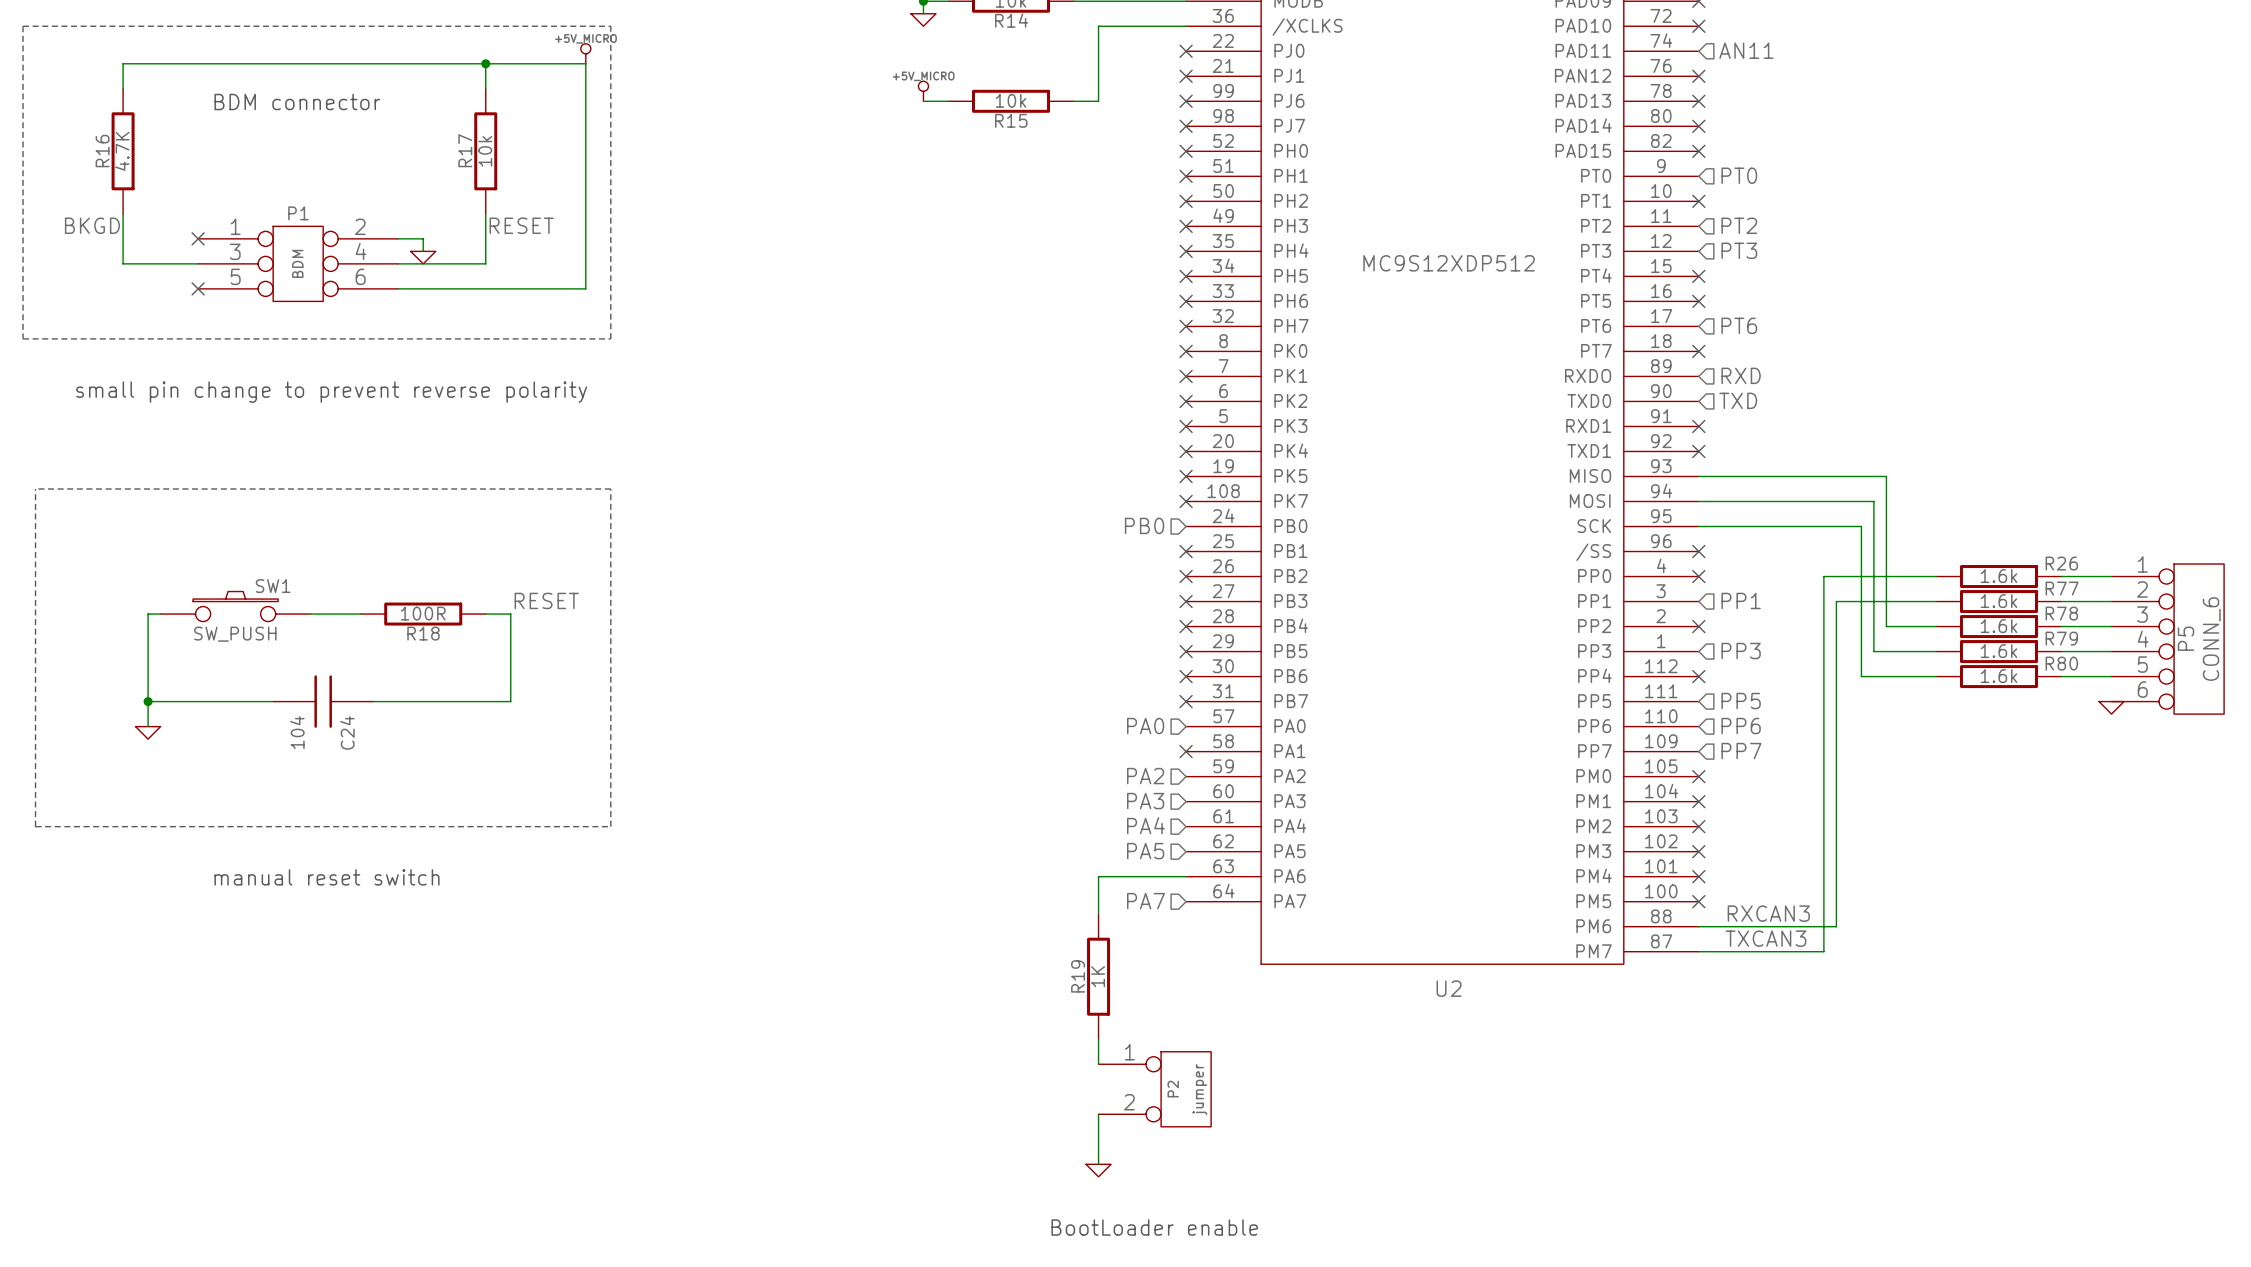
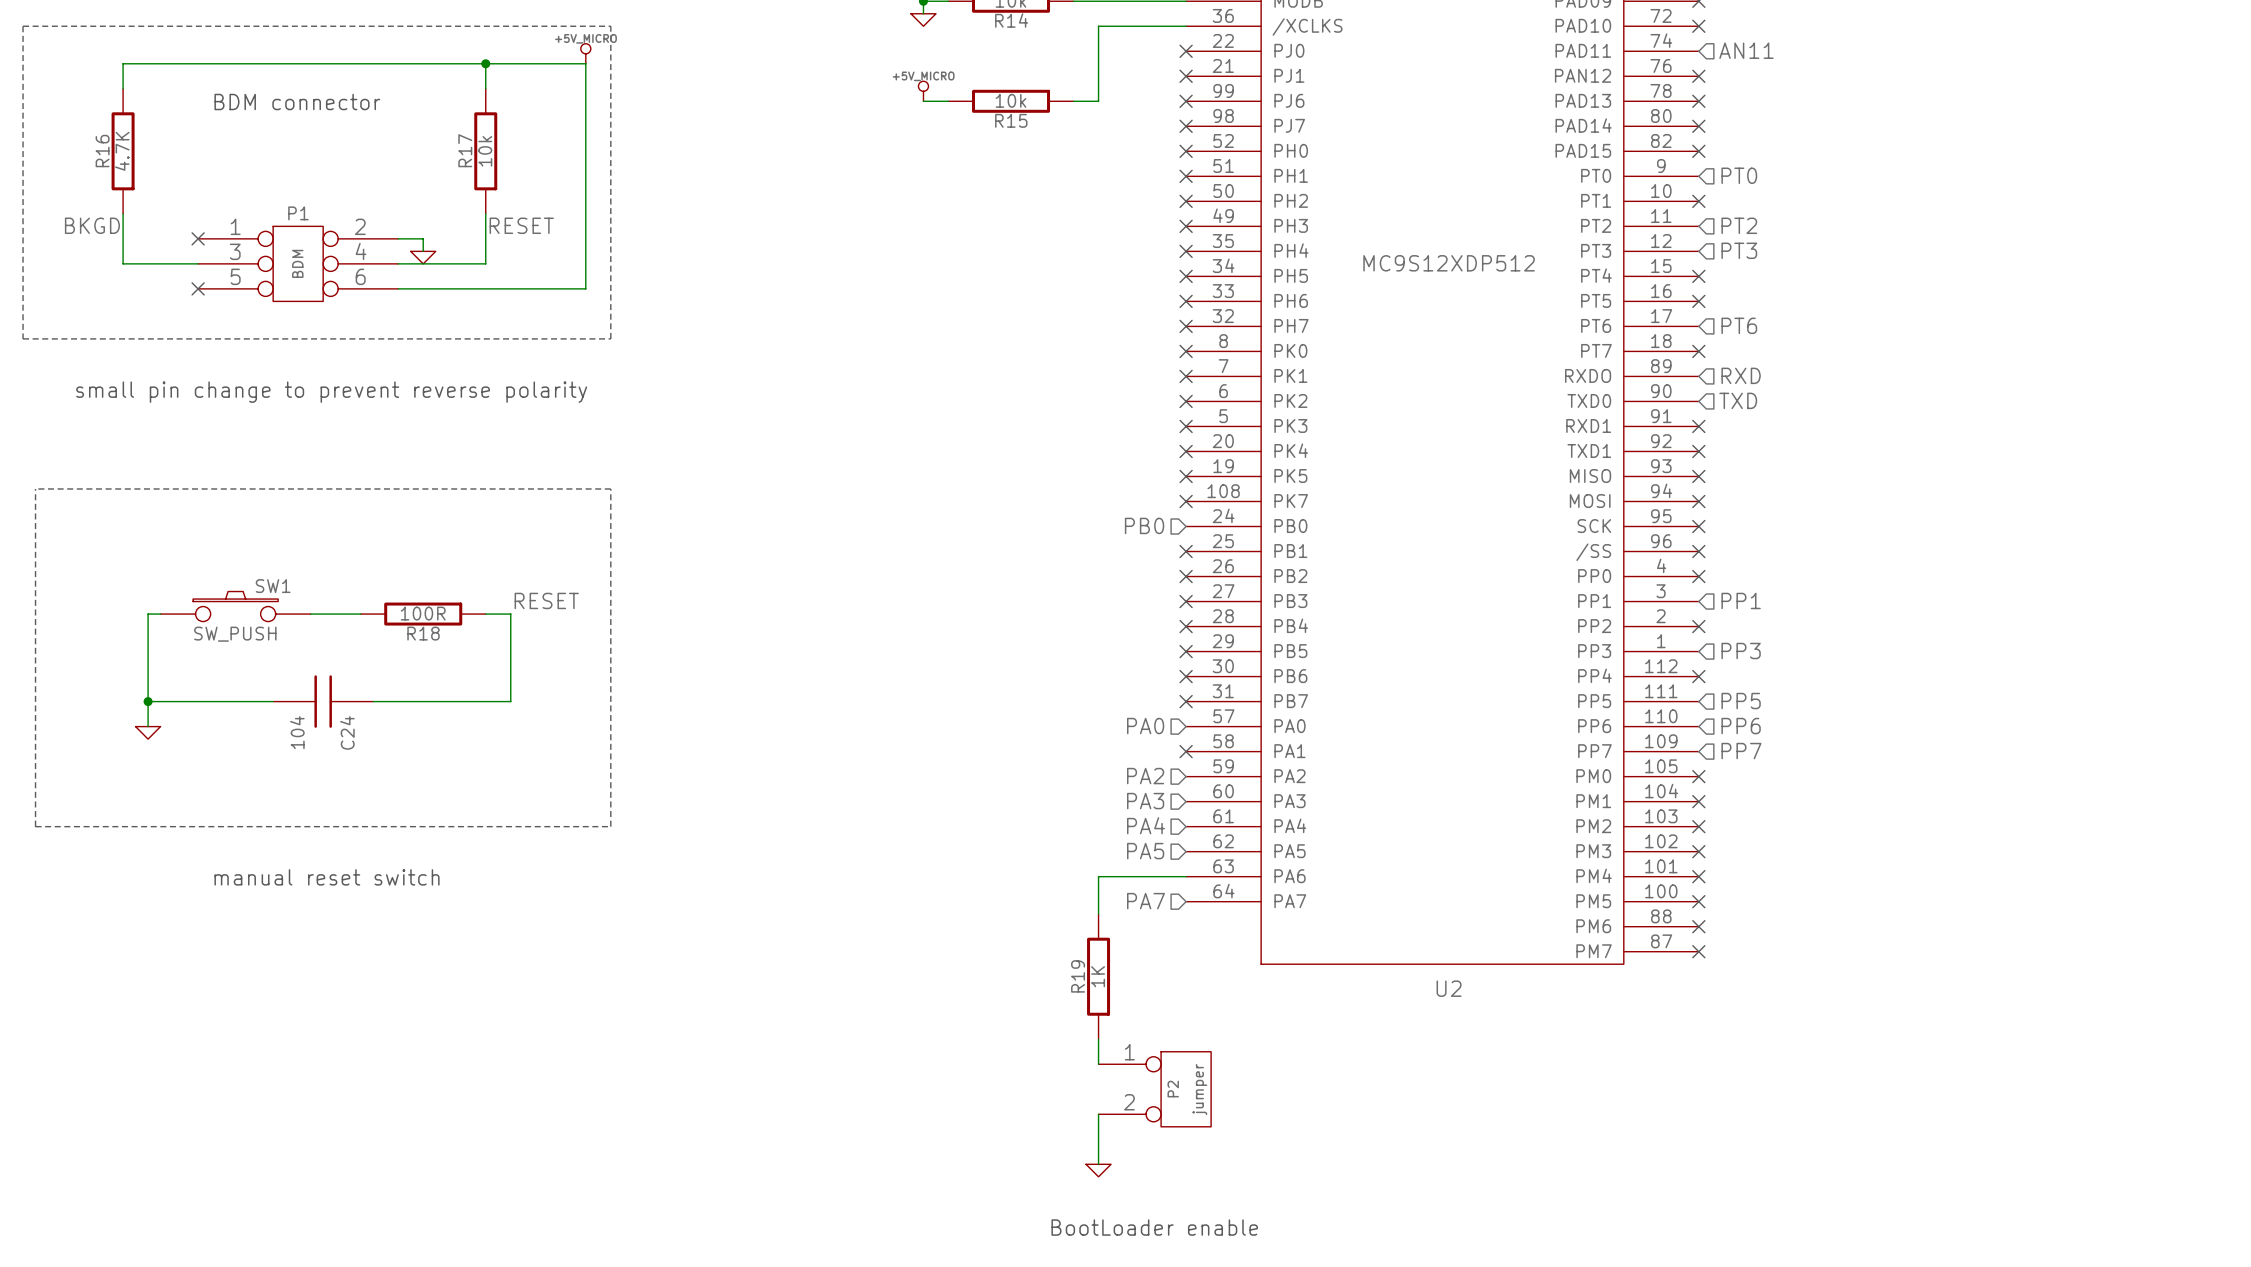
wire: (1698, 476) (1886, 476) (1886, 626) (1936, 626) -> none
no-connect mark: none -> (1698, 476)
wire: (1698, 501) (1873, 501) (1873, 651) (1936, 651) -> none
no-connect mark: none -> (1698, 501)
wire: (1698, 526) (1861, 526) (1861, 676) (1936, 676) -> none
no-connect mark: none -> (1698, 526)
wire: (1936, 576) (1823, 576) (1823, 951) (1698, 951) -> none
R26: 1.6k (1998, 576) -> none
wire: (2061, 576) (2111, 576) -> none
wire: (1936, 601) (1836, 601) (1836, 926) (1698, 926) -> none
R77: 1.6k (1998, 601) -> none
wire: (2061, 601) (2111, 601) -> none
R78: 1.6k (1998, 626) -> none
wire: (2061, 626) (2111, 626) -> none
P5: CONN_6 (2167, 639) -> none
R79: 1.6k (1998, 651) -> none
wire: (2061, 651) (2111, 651) -> none
R80: 1.6k (1998, 676) -> none
wire: (2061, 676) (2111, 676) -> none
power symbol: (2111, 707) -> none
label: RXCAN3 (1768, 913) -> none
no-connect mark: none -> (1698, 926)
label: TXCAN3 (1765, 938) -> none
no-connect mark: none -> (1698, 951)

